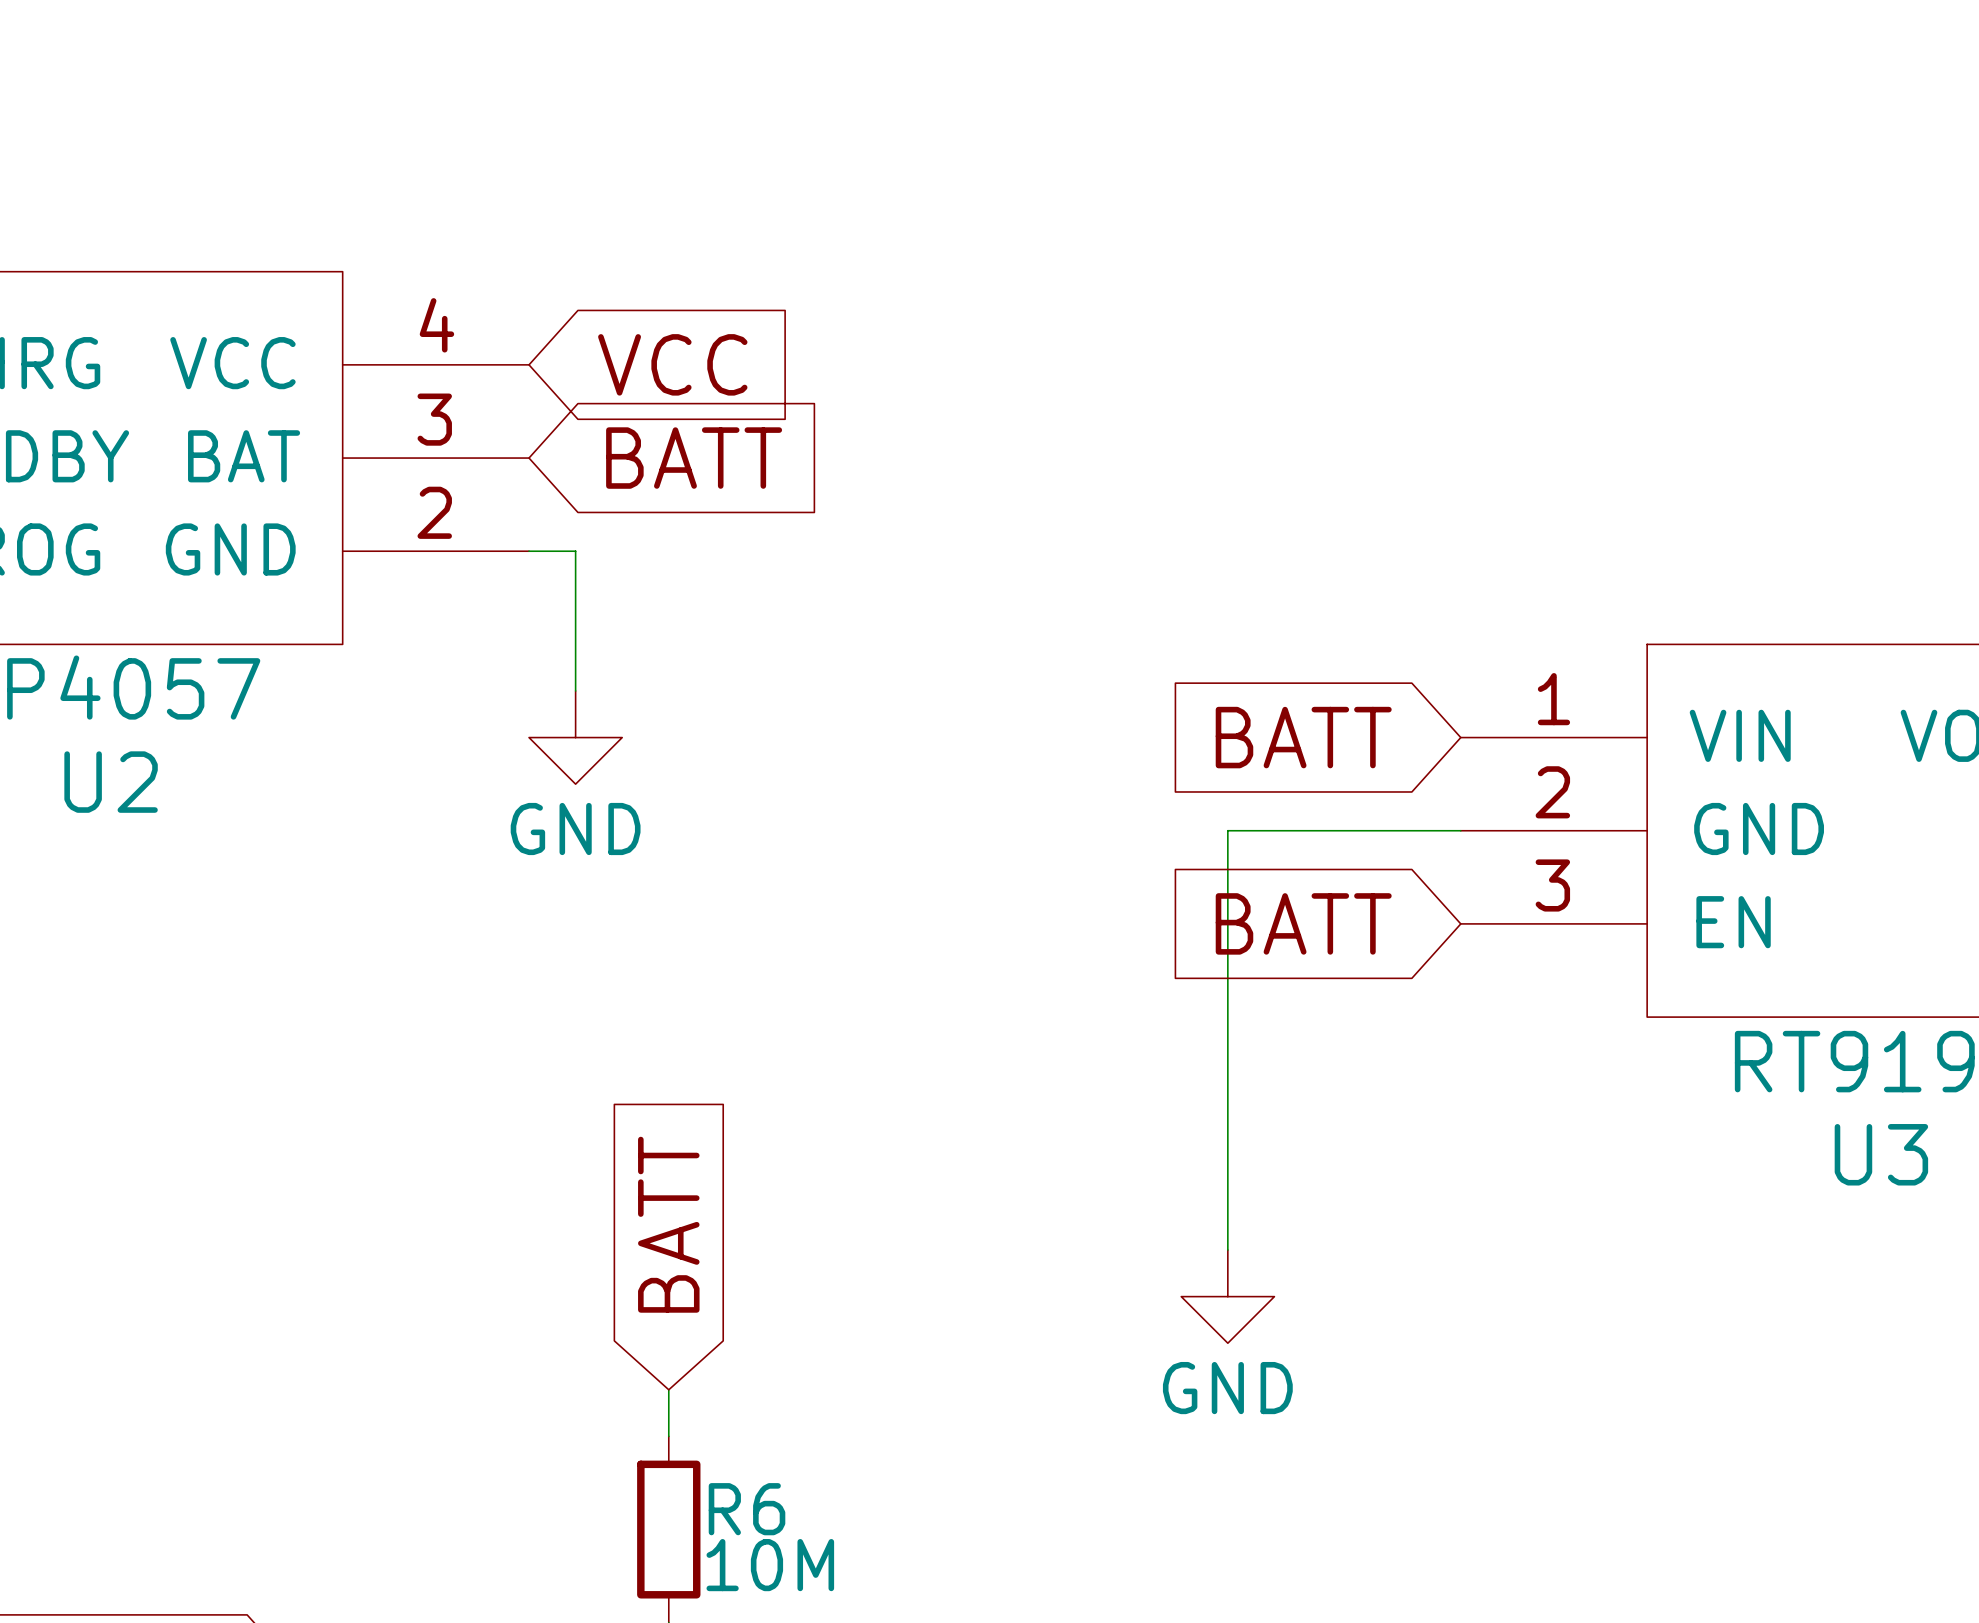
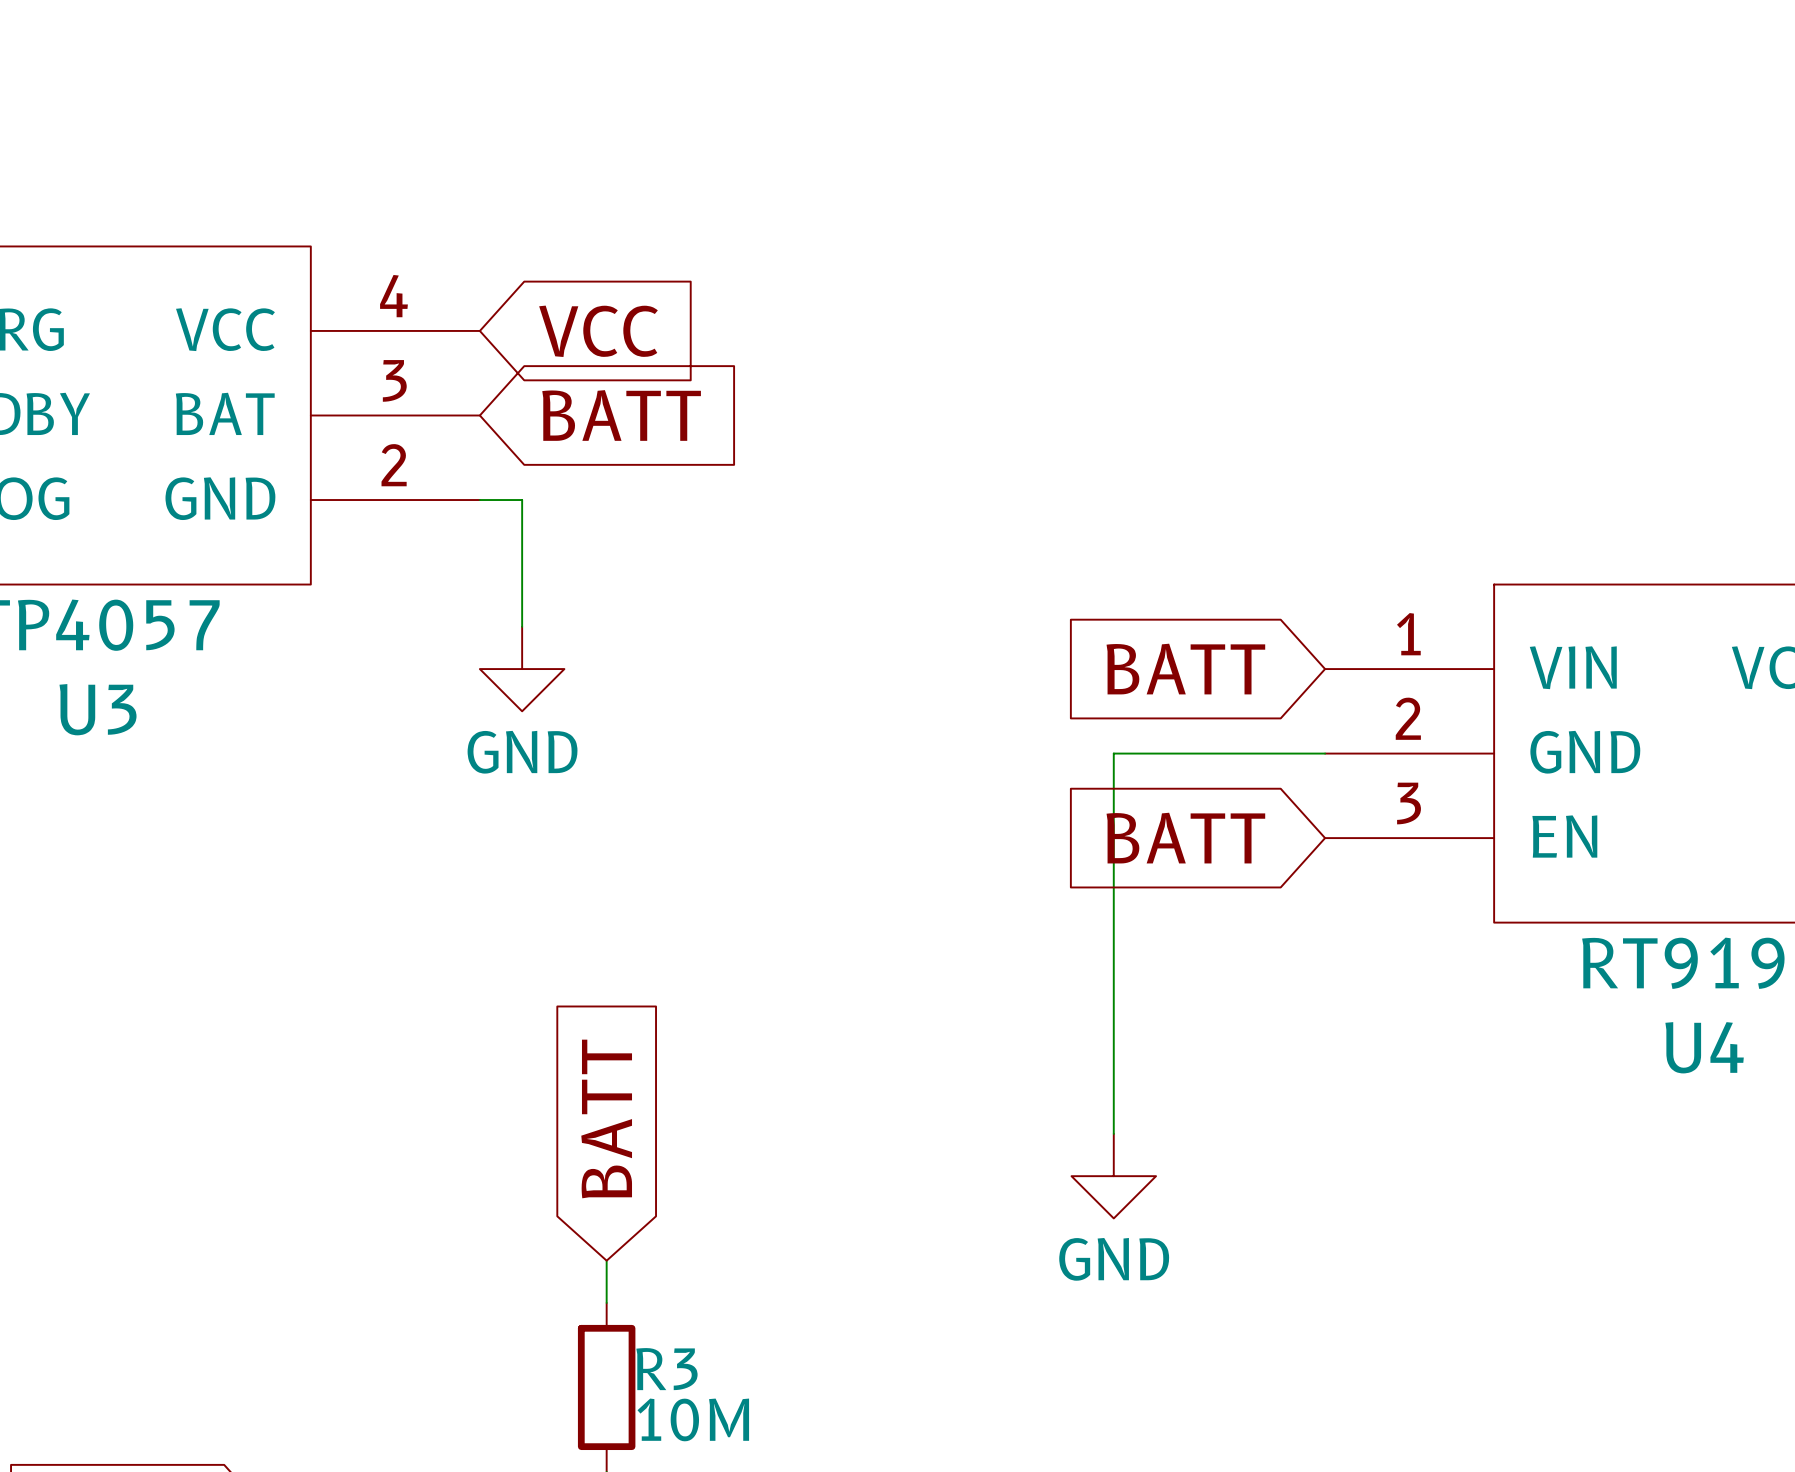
U2 name: U2 (111, 782) -> U3 (98, 709)
U3 name: U3 (1881, 1154) -> U4 (1704, 1047)
R6 name: R6 (747, 1509) -> R3 (666, 1369)

